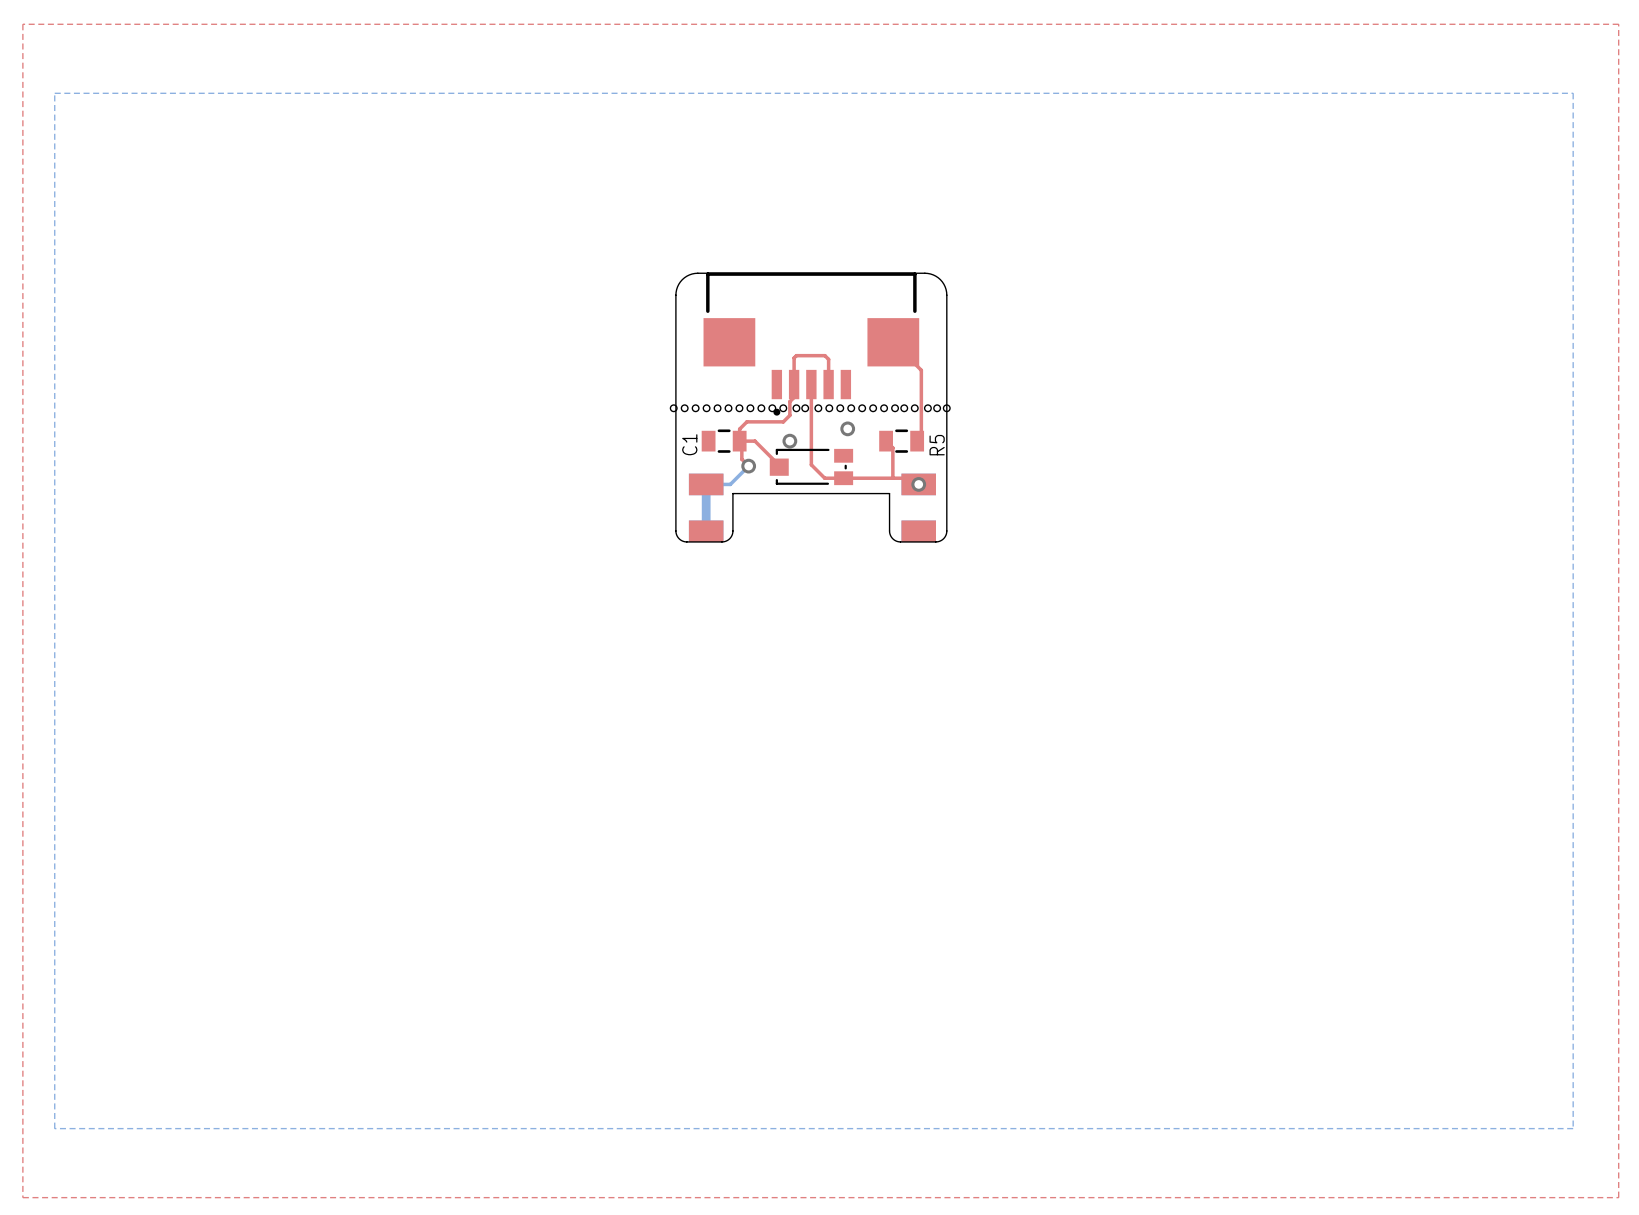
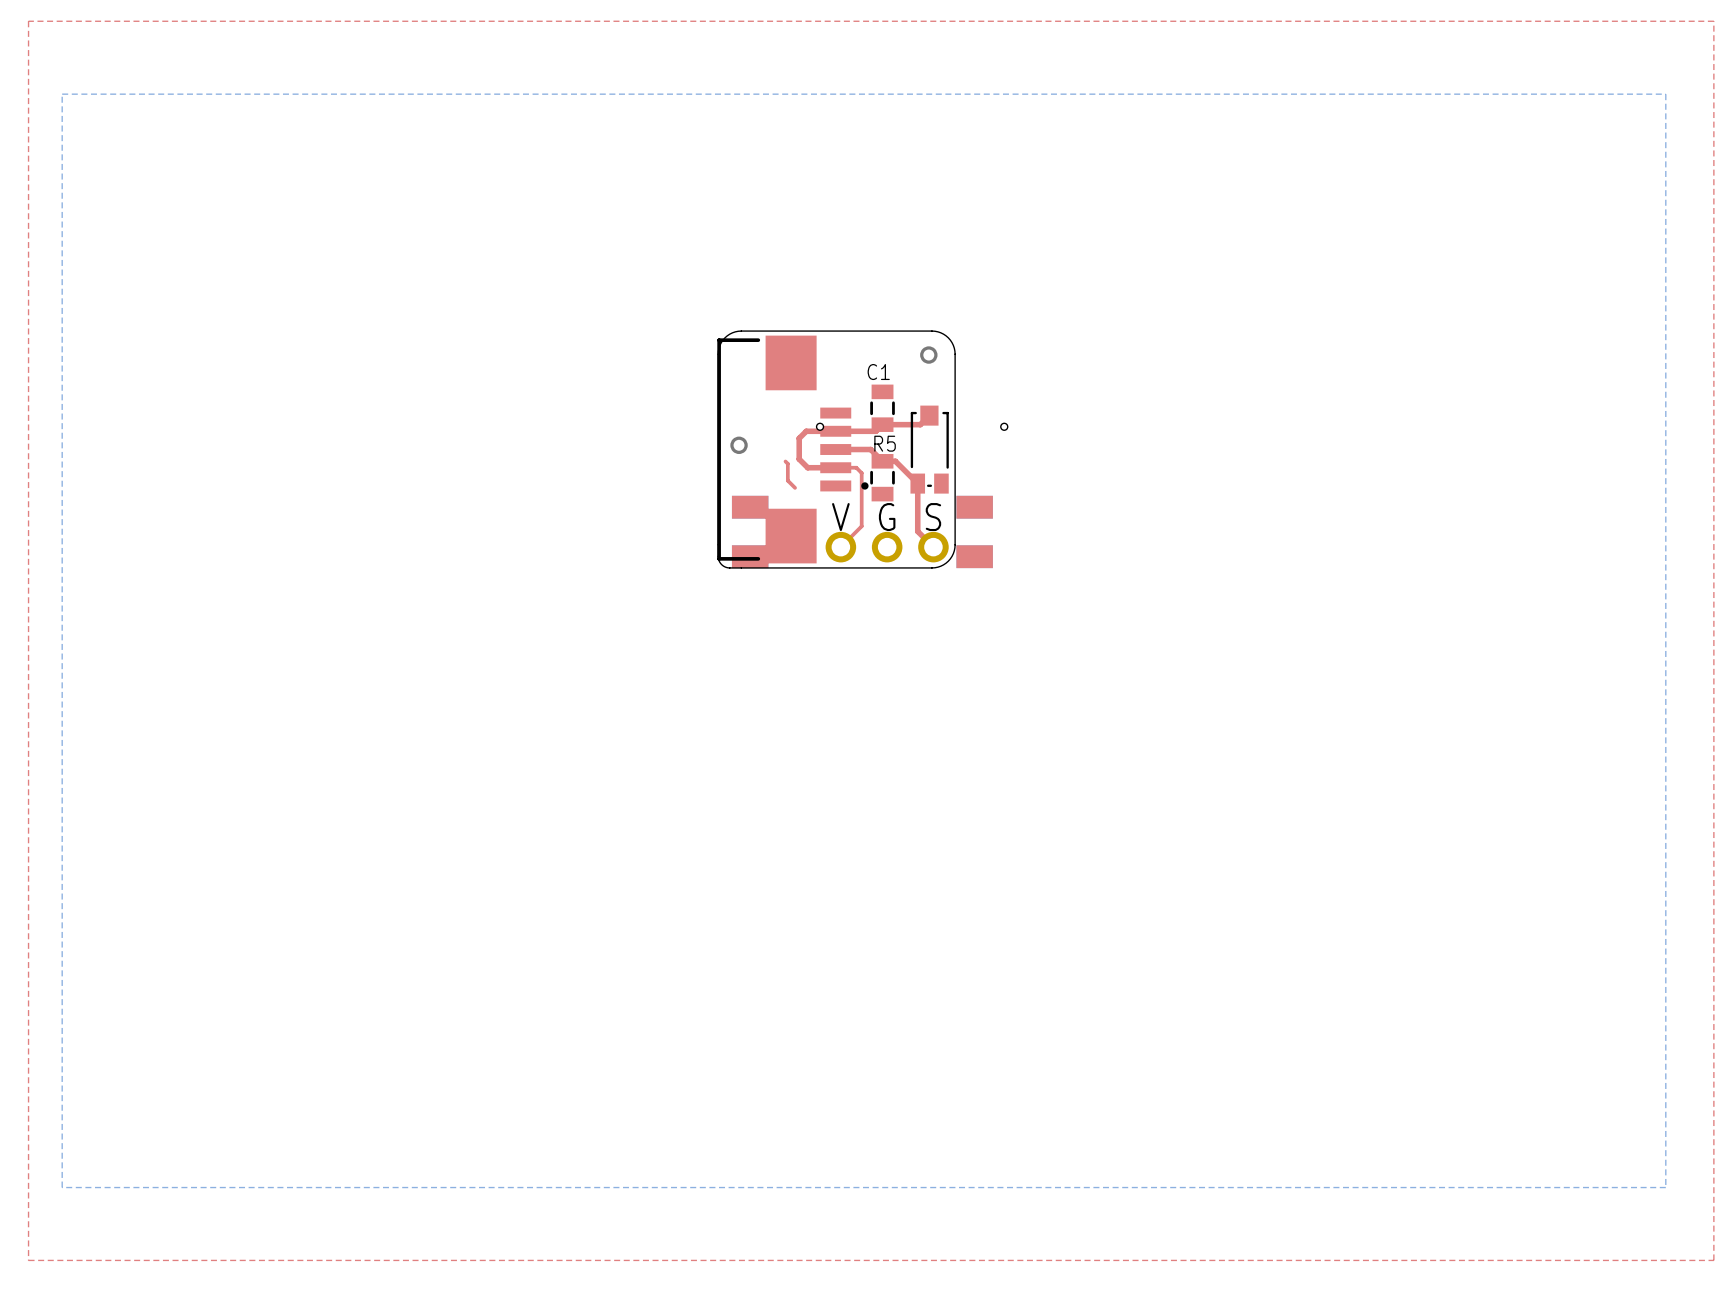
board edge: (675, 339) (676, 289) (684, 277) (694, 273) (924, 273) (938, 277) (946, 289) (946, 530) (943, 538) (935, 541) (900, 541) (893, 539) (889, 532) (889, 493) (732, 493) (732, 533) (728, 539) (721, 541) -> (718, 354) (719, 345) (724, 337) (732, 332) (741, 331) (934, 331) (946, 335) (954, 348) (955, 544) (950, 558) (943, 564) (931, 567) (766, 567)
via: none -> (928, 355)
top track: (893, 342) (921, 370) (921, 436) (917, 441) -> none
part rotation: 0° (811, 343) -> 90° counterclockwise (792, 449)
top track: (811, 384) (811, 464) (824, 478) (912, 478) (918, 484) -> none
top track: (828, 384) (828, 359) (824, 355) (796, 355) (794, 358) (794, 397) (789, 401) (789, 415) (783, 421) (746, 421) (739, 429) (739, 441) (754, 441) (779, 467) -> none
top track: none -> (929, 415) (920, 424) (882, 424) (875, 431) (806, 431) (799, 438) (799, 459) (807, 467) (856, 467) (861, 473) (861, 526) (840, 547)
hole: (673, 408) -> none
hole: (684, 408) -> none
hole: (695, 408) -> none
hole: (706, 408) -> none
hole: (717, 408) -> none
hole: (728, 408) -> none
hole: (739, 408) -> none
hole: (750, 408) -> none
hole: (761, 408) -> none
hole: (783, 408) -> none
hole: (796, 408) -> none
hole: (805, 408) -> none
hole: (818, 408) -> none
hole: (829, 408) -> none
hole: (840, 408) -> none
hole: (851, 408) -> none
hole: (862, 408) -> none
hole: (873, 408) -> none
hole: (884, 408) -> none
hole: (895, 408) -> none
hole: (904, 408) -> none
hole: (914, 408) -> none
hole: (927, 408) -> none
hole: (937, 408) -> none
via: none -> (739, 445)
via: (847, 428) -> none
top track: none -> (835, 449) (870, 449) (882, 461) (895, 461) (917, 483) (917, 531) (933, 547)
C1 rotation: 0° (724, 441) -> 90° clockwise (882, 408)
C1 position: (724, 441) -> (882, 408)
via: (789, 441) -> none
top track: (886, 441) (892, 447) (892, 478) -> none
R5 rotation: 0° (901, 441) -> 90° clockwise (882, 477)
R5 position: (901, 441) -> (882, 477)
R5 name position: R5 (937, 445) -> R5 (885, 443)
bottom track: (748, 466) (730, 484) (706, 484) (706, 531) -> none
via: (748, 466) -> none
part rotation: 0° (811, 466) -> 90° clockwise (929, 449)
part position: (811, 466) -> (929, 449)
via: (918, 484) -> none
text: none -> V (840, 517)
text: none -> G (887, 517)
text: none -> S (933, 517)
part: none -> (887, 547)

